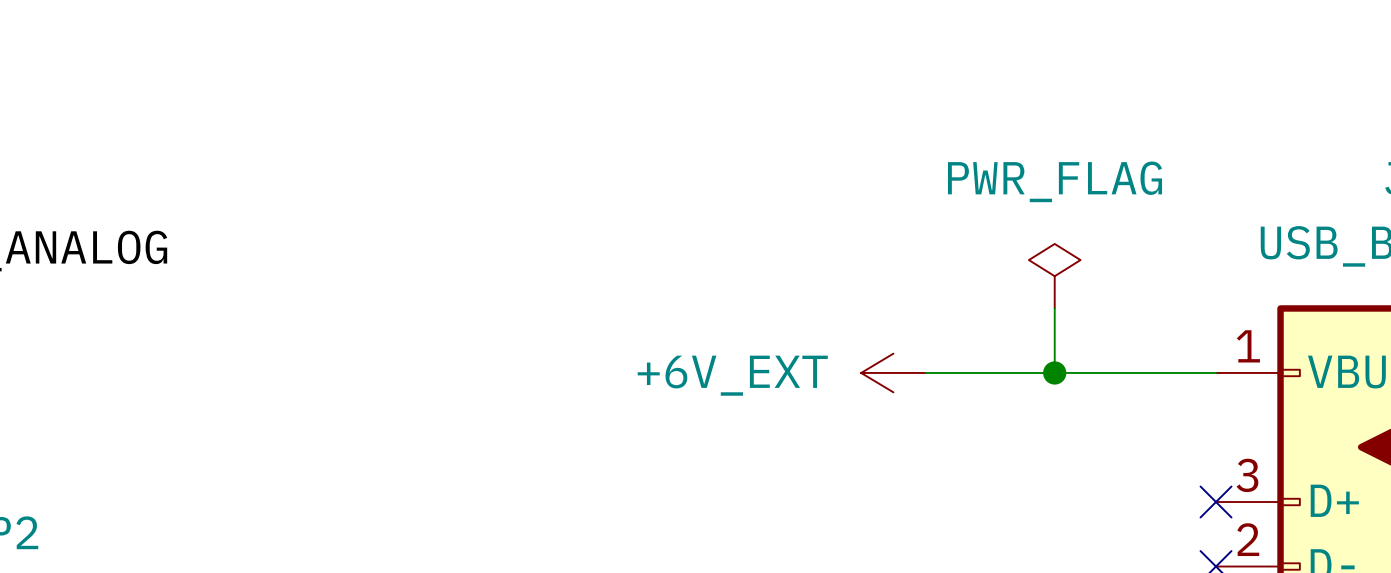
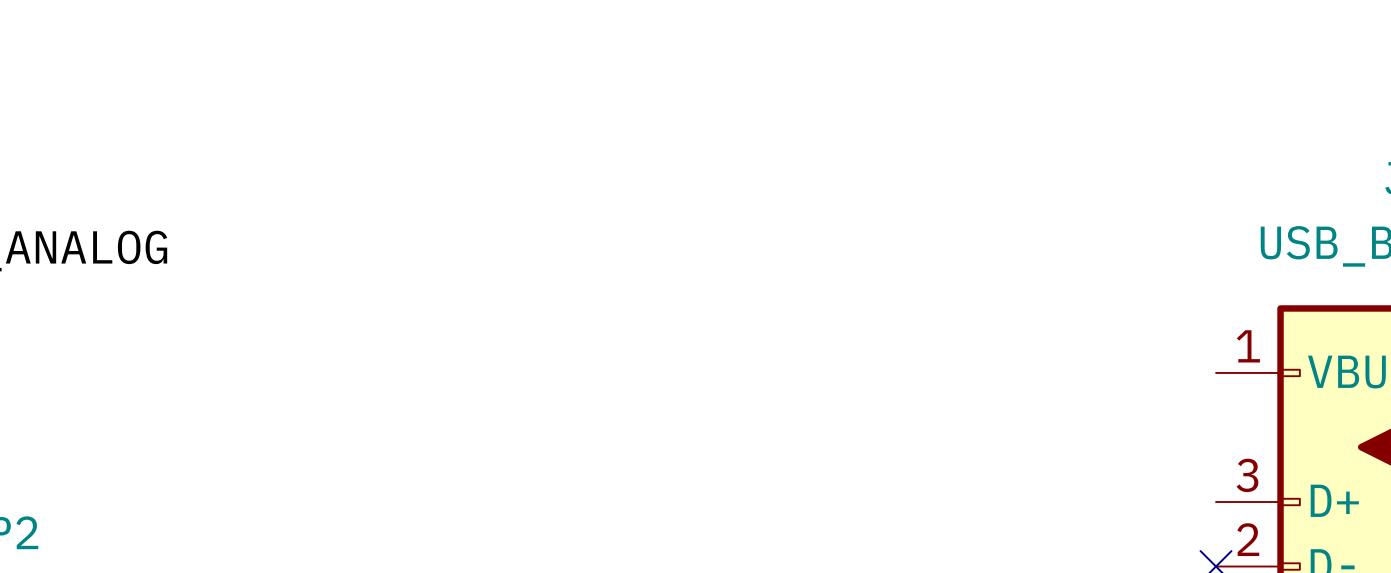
power symbol: PWR_FLAG (1054, 276) -> none
wire: (1054, 308) (1054, 372) -> none
power symbol: +6V_EXT (893, 372) -> none
wire: (925, 372) (1216, 372) -> none
junction: (1054, 372) -> none
no-connect mark: (1216, 502) -> none

